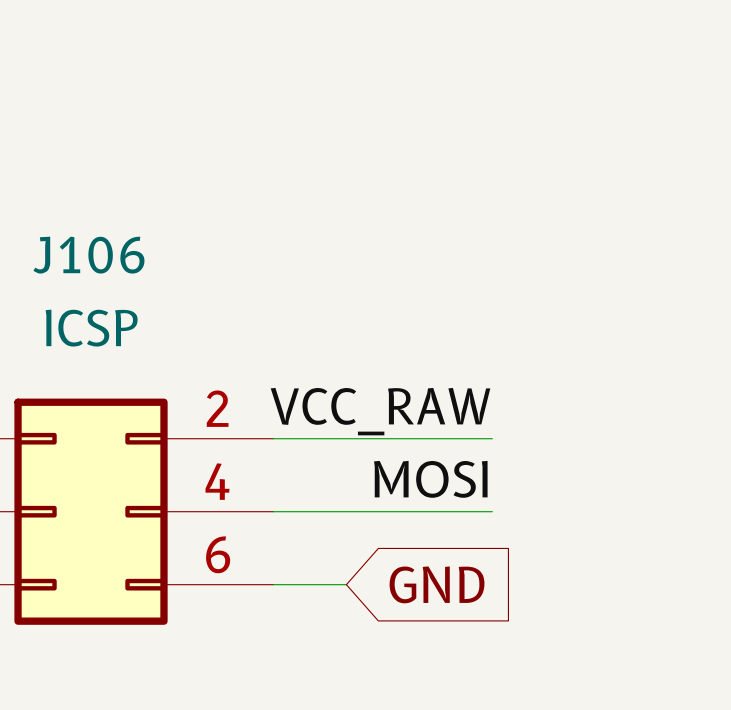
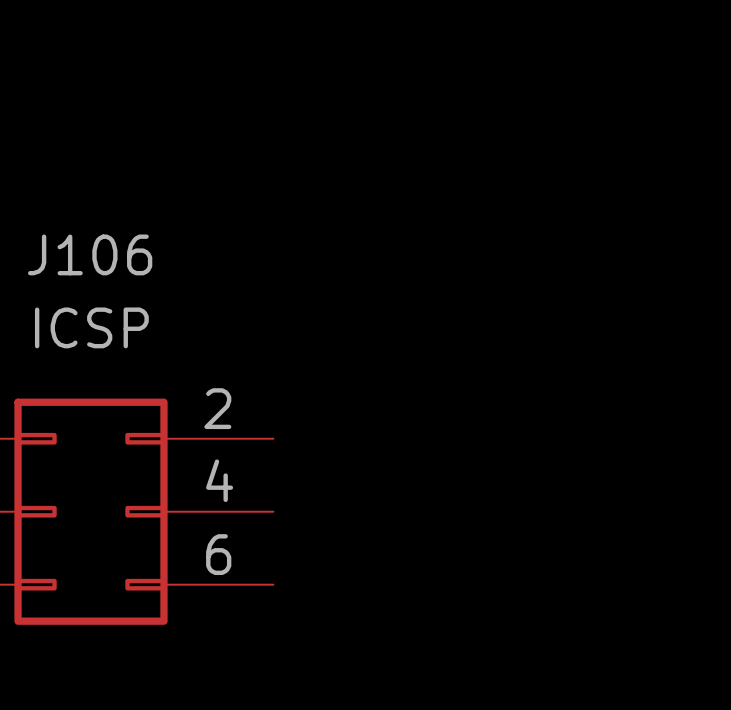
label: VCC_RAW (380, 411) -> none
wire: (273, 438) (492, 438) -> none
label: MOSI (430, 479) -> none
wire: (273, 511) (492, 511) -> none
wire: (273, 584) (346, 584) -> none
global label: GND (437, 584) -> none

